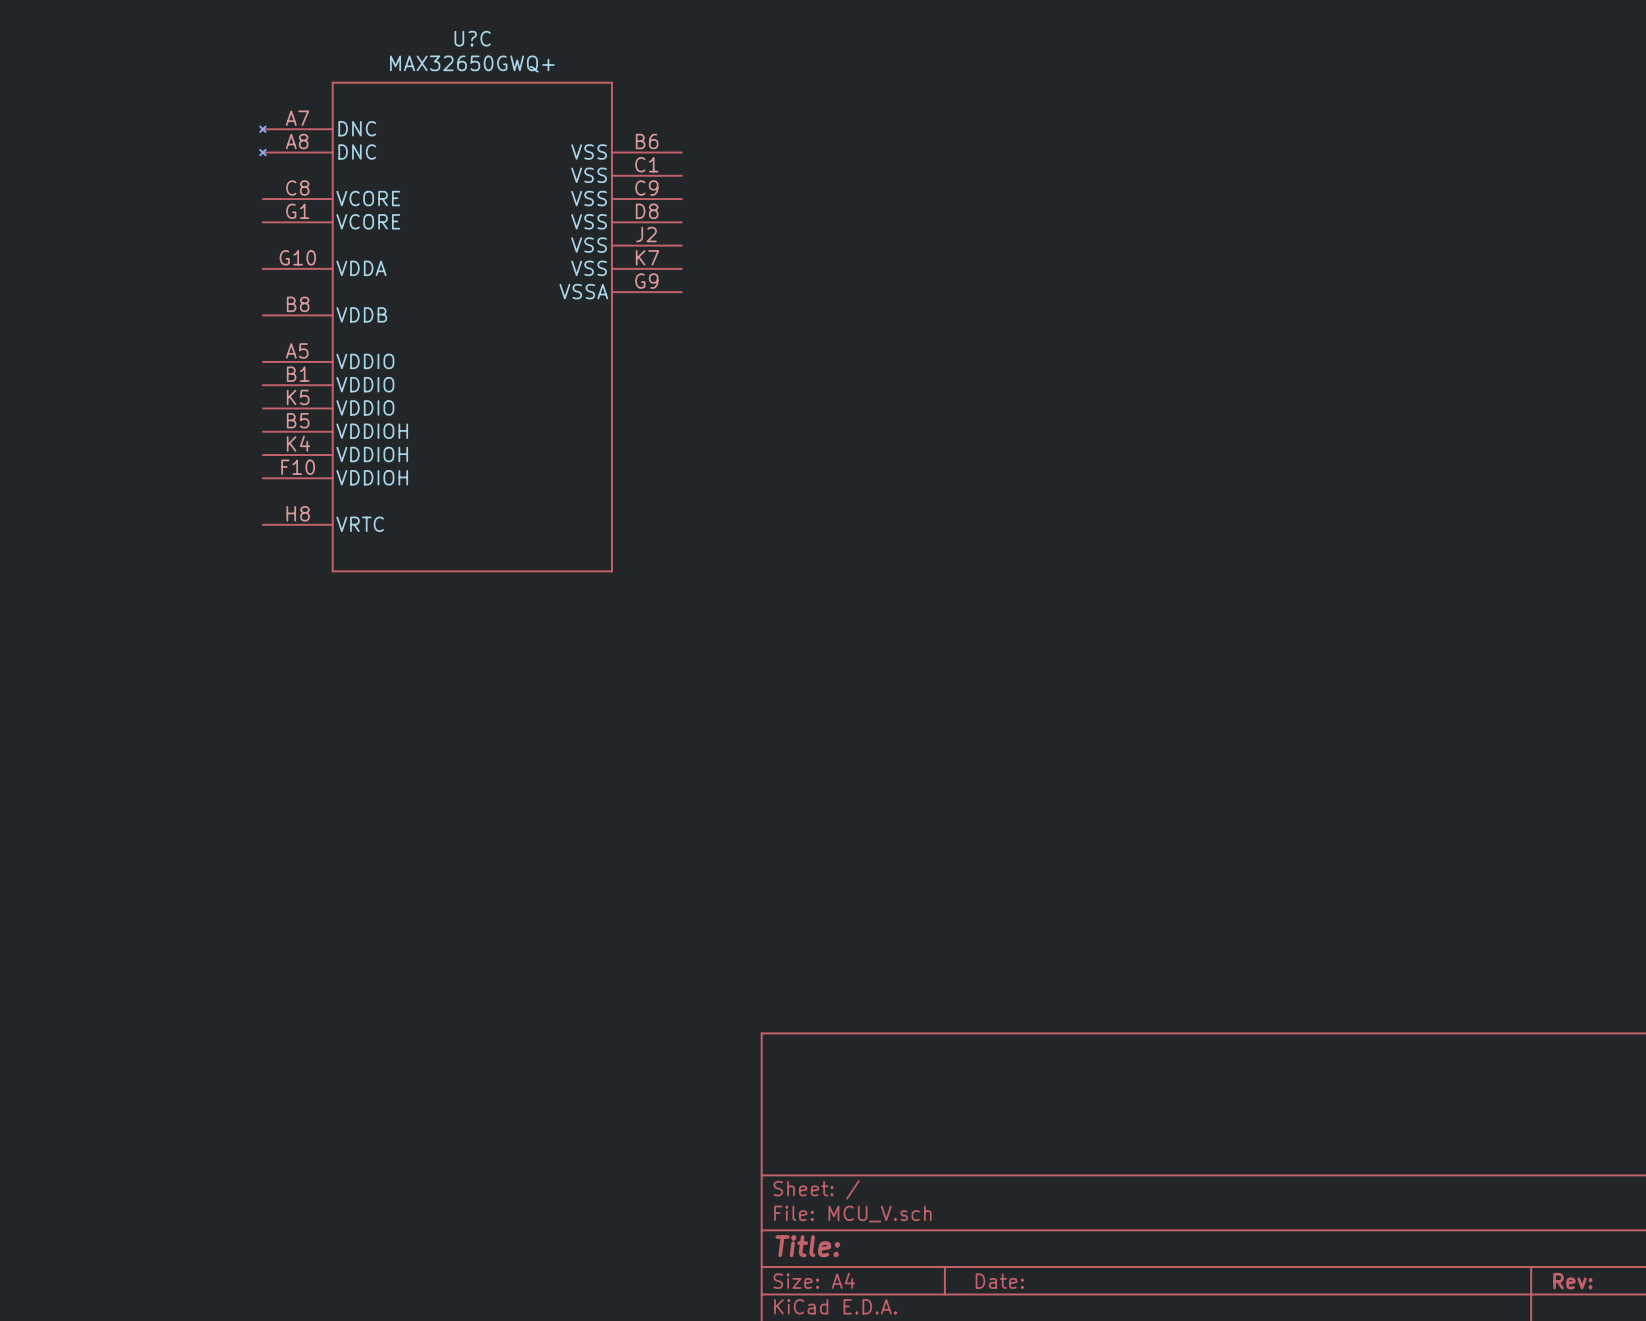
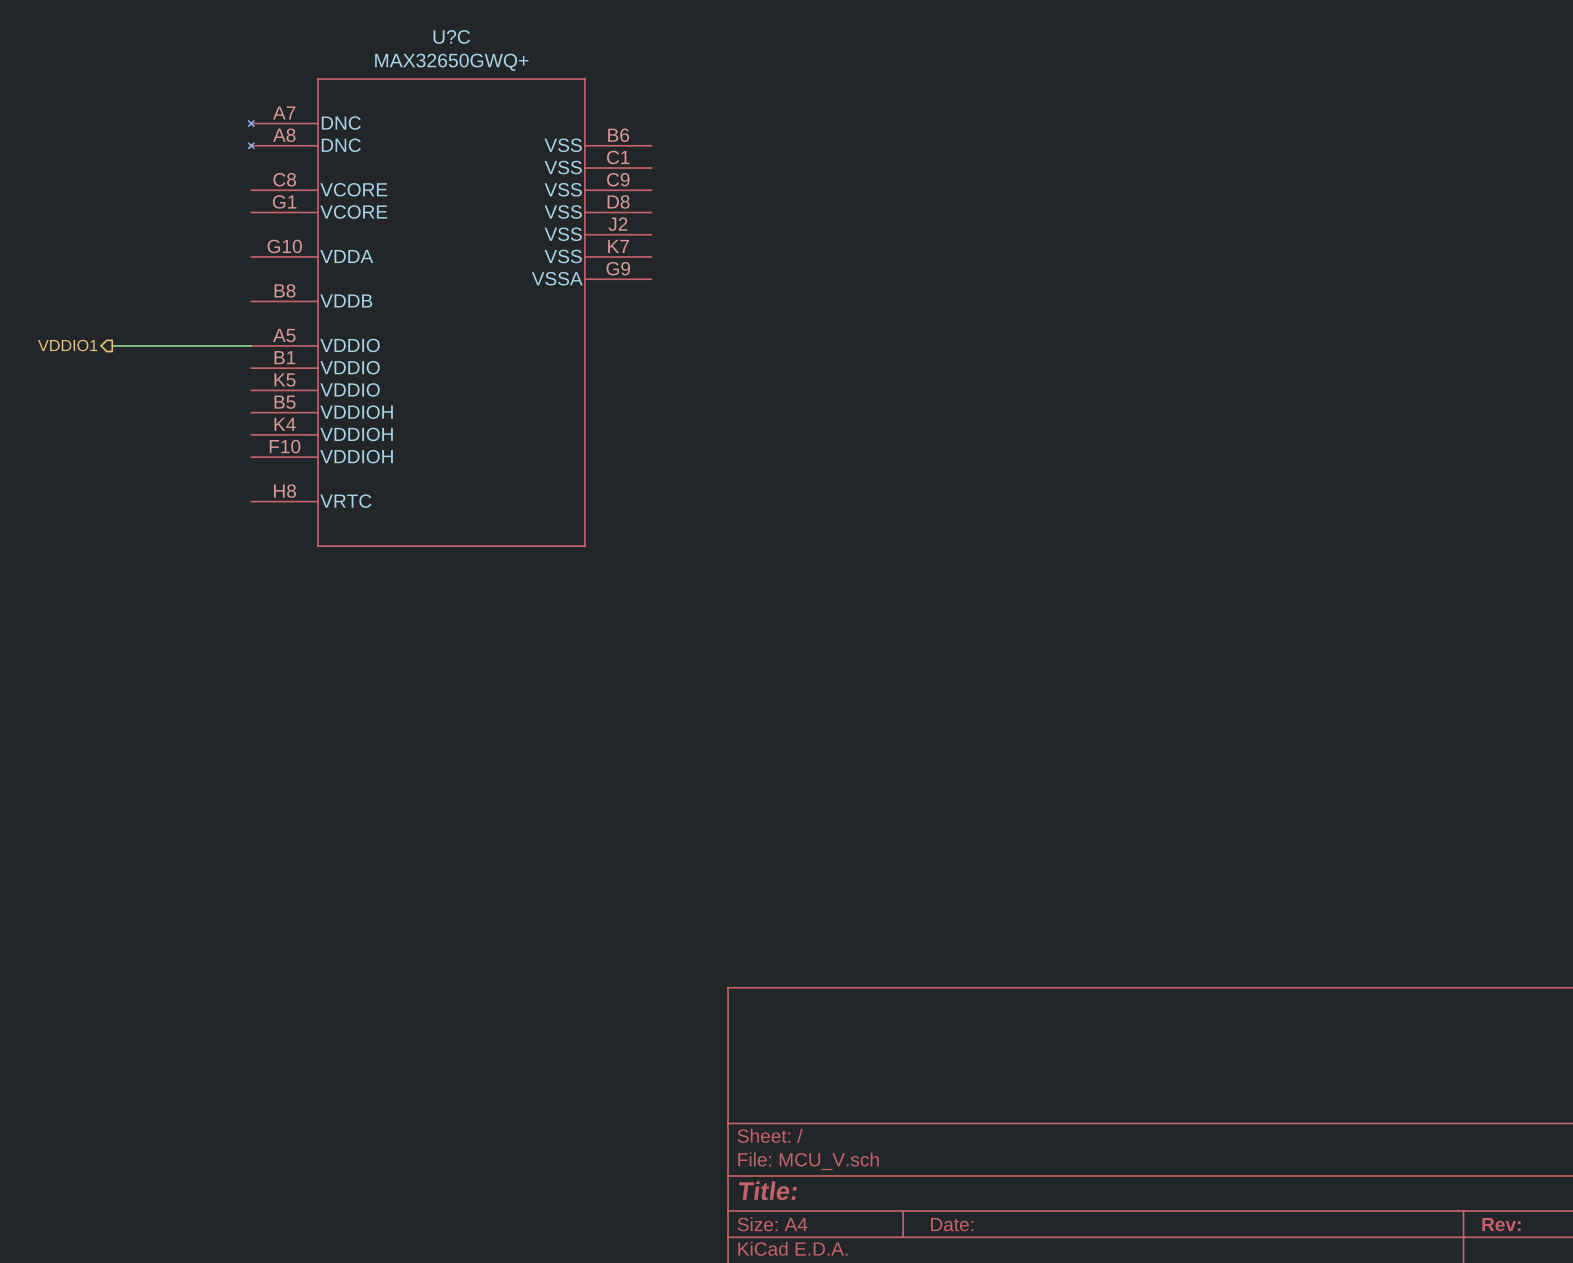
hierarchical label: none -> VDDIO1 (67, 345)
wire: none -> (112, 345) (251, 345)

